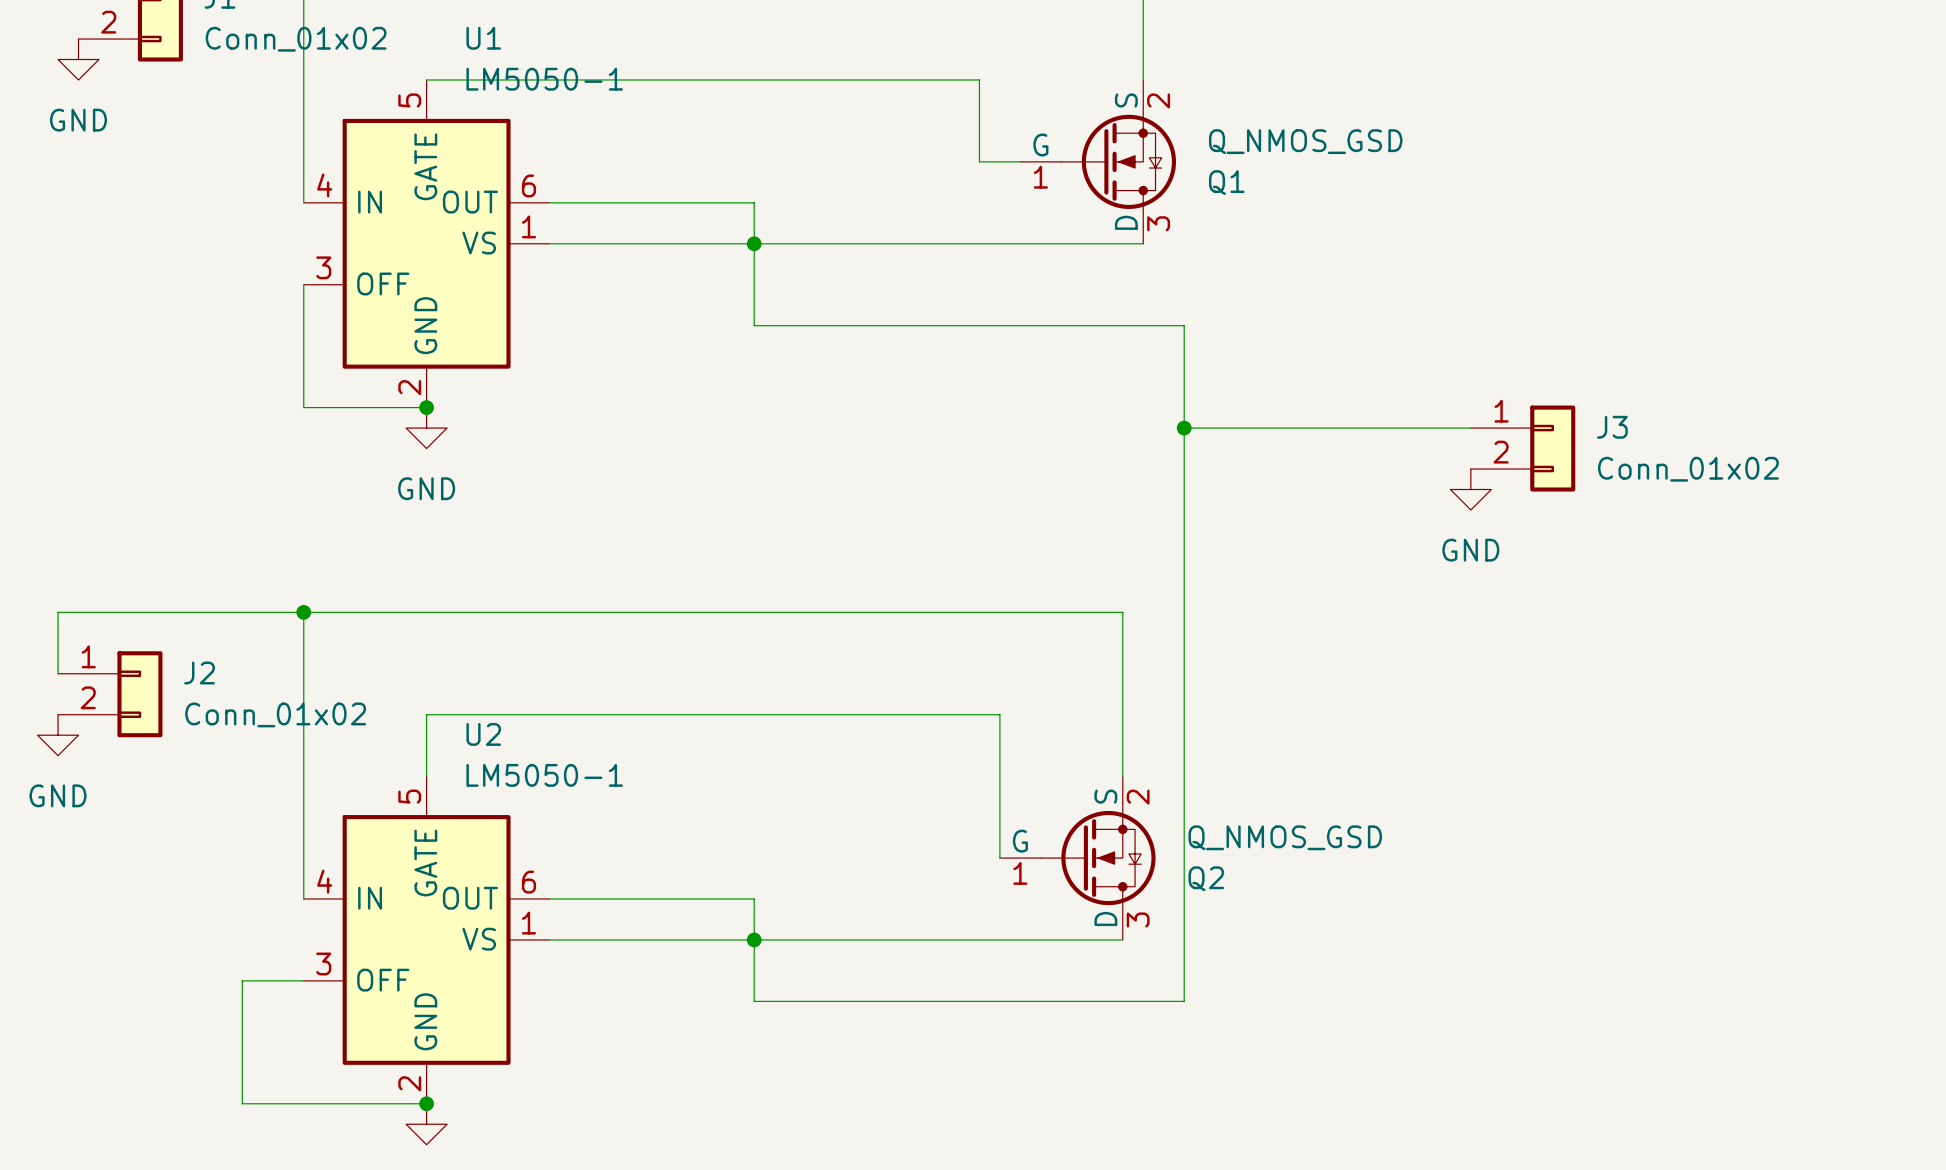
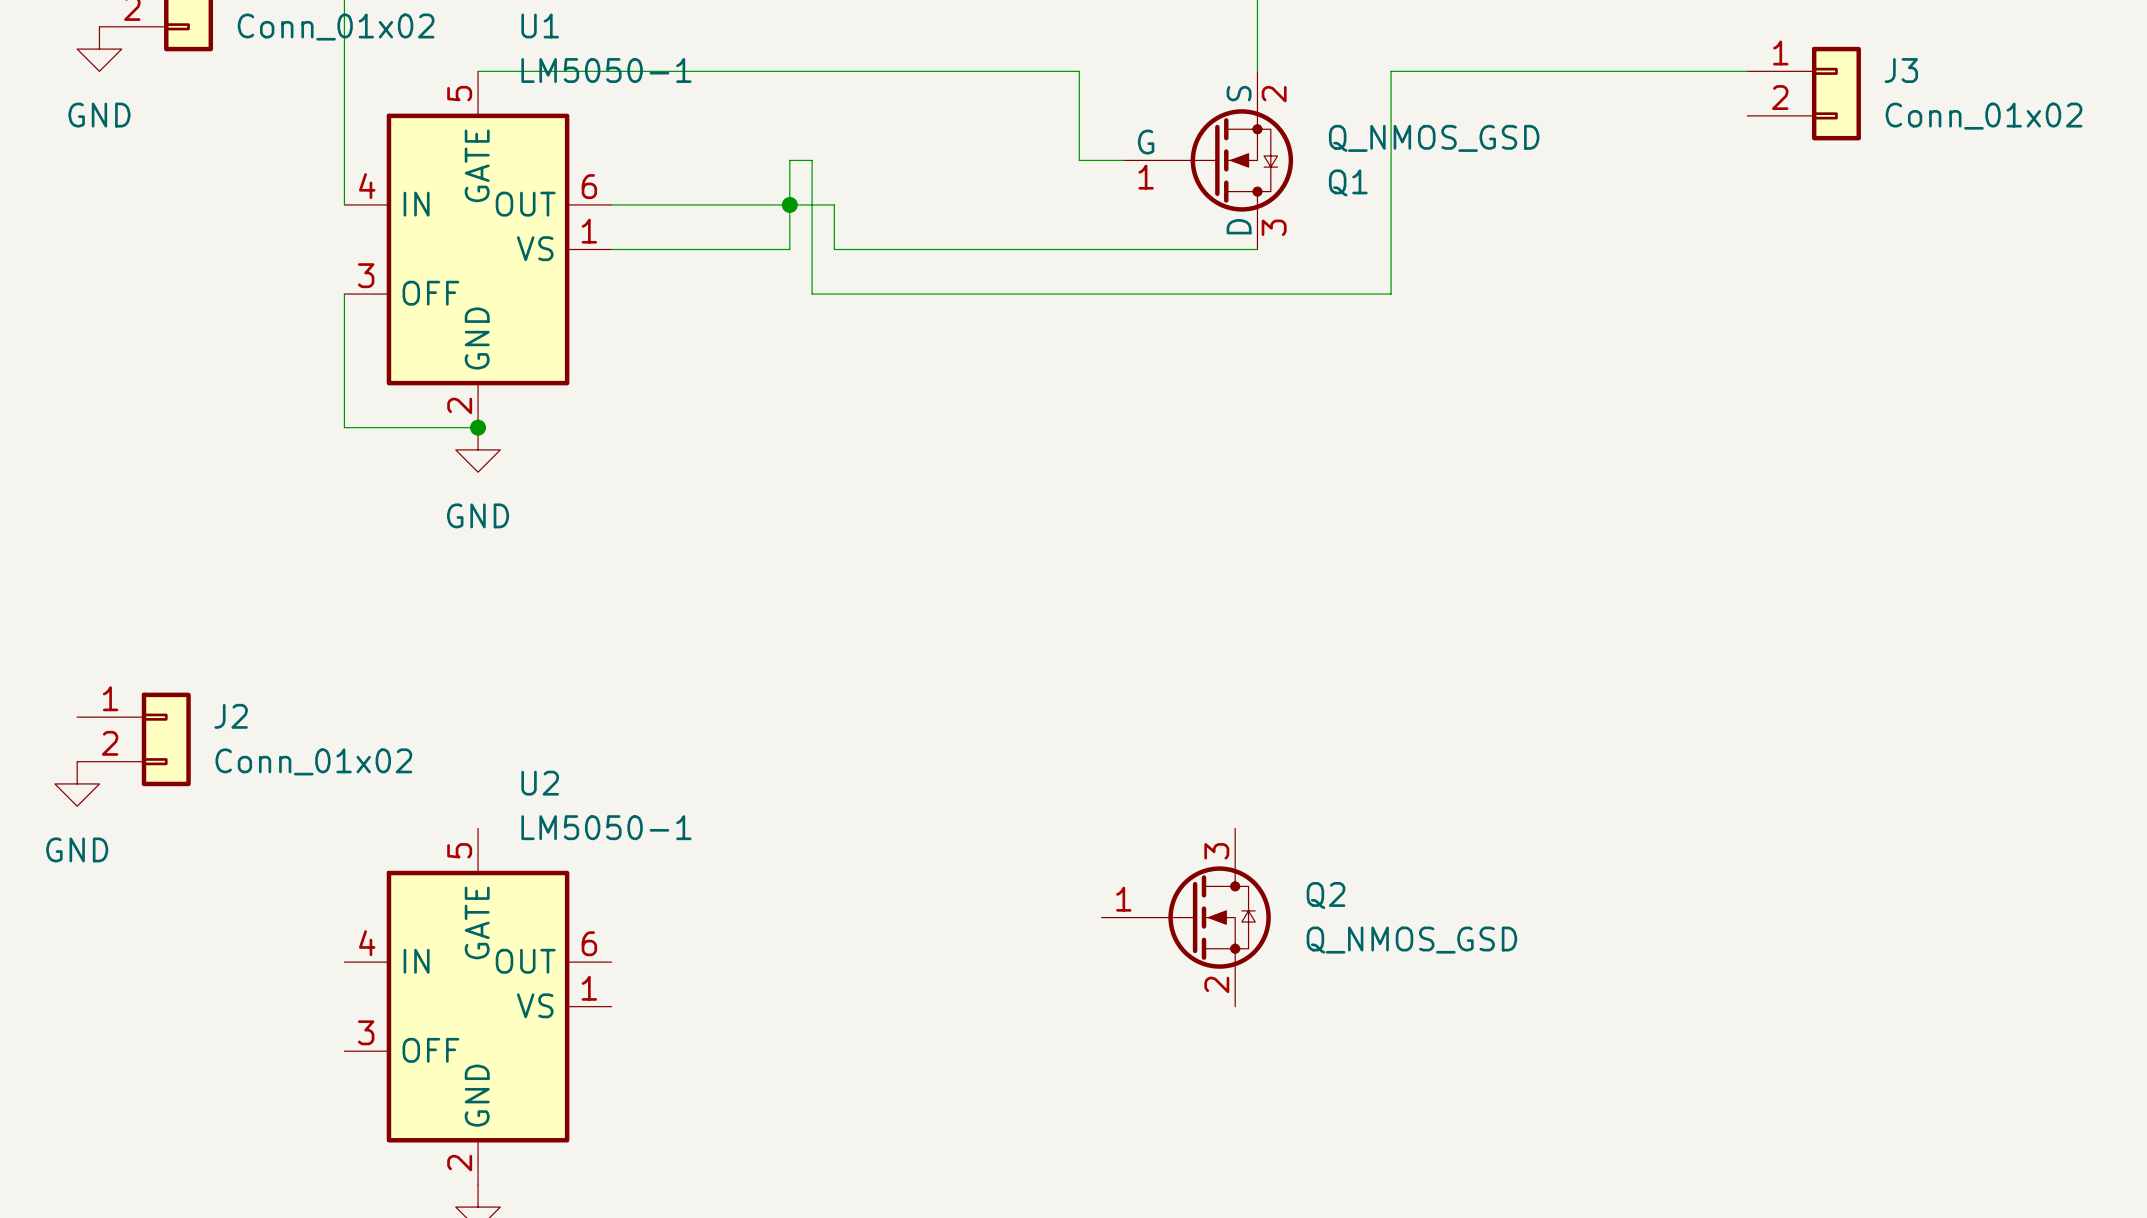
wire: (713, 243) (754, 243) (754, 325) (1184, 325) (1184, 1001) (754, 1001) (754, 899) (549, 899) -> (789, 249) (789, 160) (812, 160) (812, 294) (1391, 294) (1391, 71) (1747, 71)
junction position: (754, 243) -> (789, 204)
wire: (1184, 428) (1470, 428) -> none
junction: (1184, 428) -> none
J3 position: (1523, 448) -> (1804, 93)
power symbol: GND (1470, 489) -> none
wire: (303, 612) (303, 899) -> none
junction: (303, 612) -> none
wire: (58, 673) (58, 612) (1122, 612) (1122, 776) -> none
wire: (426, 776) (426, 714) (999, 714) (999, 858) -> none
Q2 symbol: [999, 776, 1156, 940] -> [1101, 828, 1271, 1007]
Q2 value position: Q_NMOS_GSD (1285, 837) -> Q_NMOS_GSD (1411, 940)
Q2 name position: Q2 (1206, 878) -> Q2 (1326, 895)
wire: (549, 939) (1122, 939) -> none
junction: (754, 939) -> none
wire: (303, 980) (242, 980) (242, 1103) (426, 1103) -> none
junction: (426, 1103) -> none

